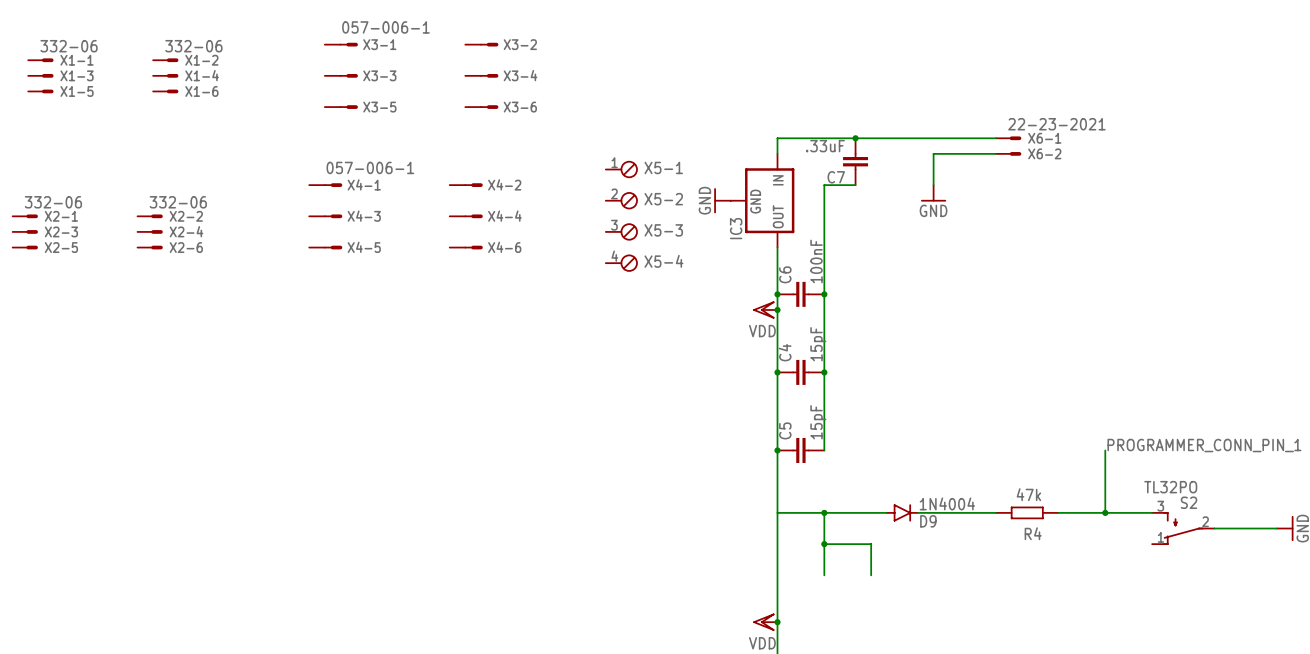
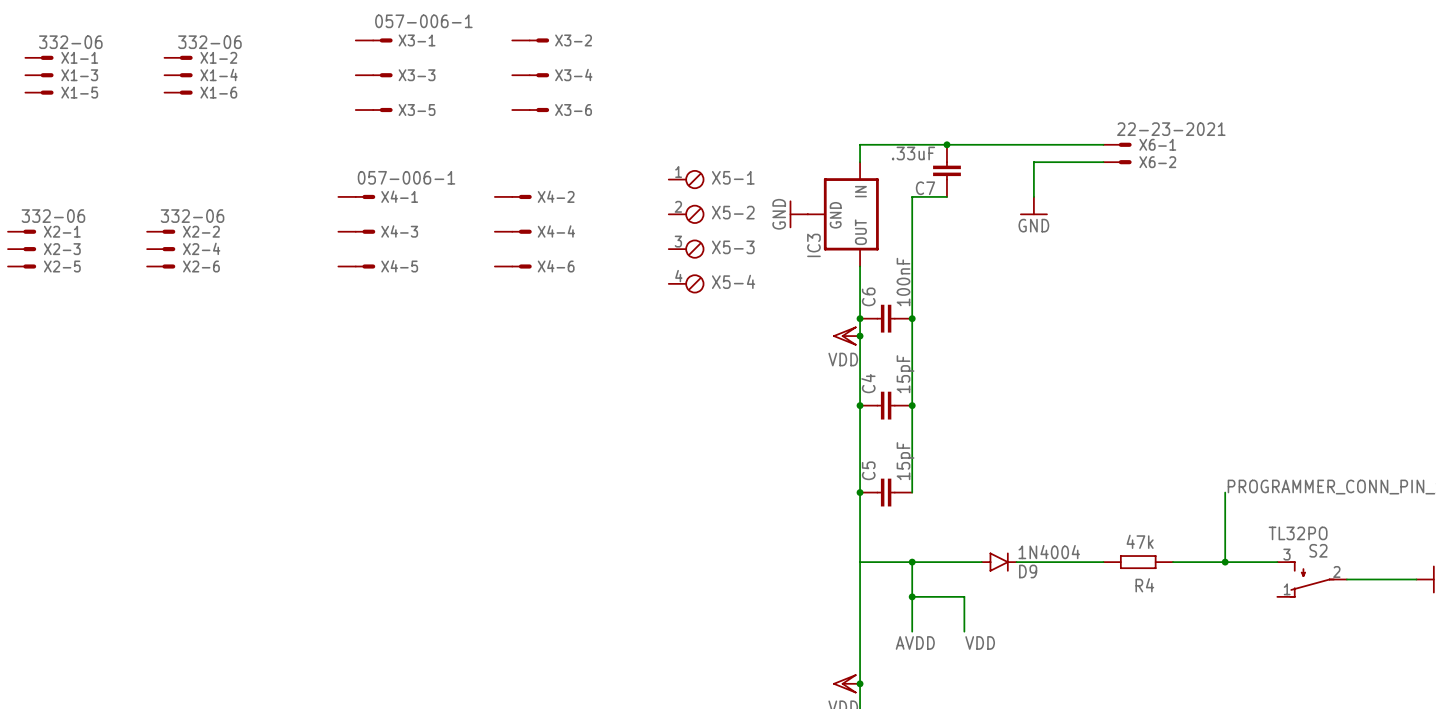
text: none -> AVDD (915, 642)
text: none -> VDD (980, 642)

